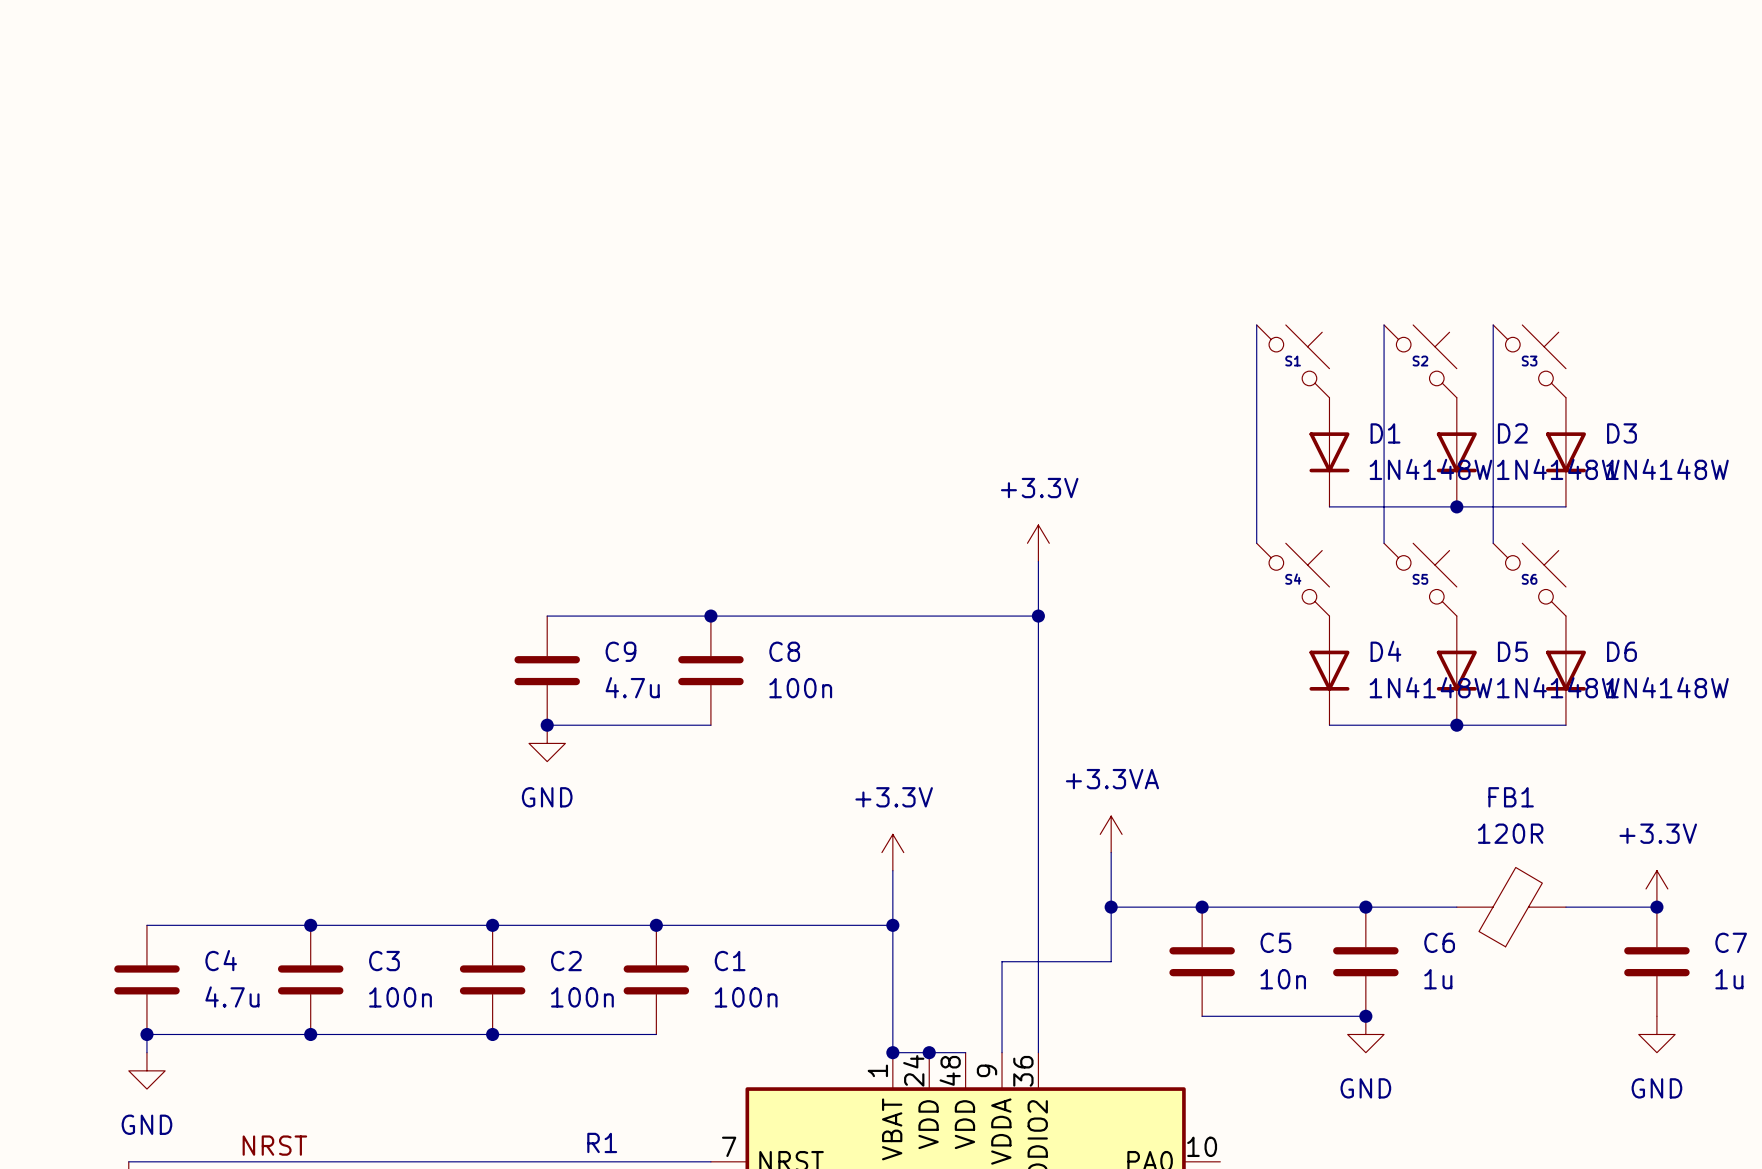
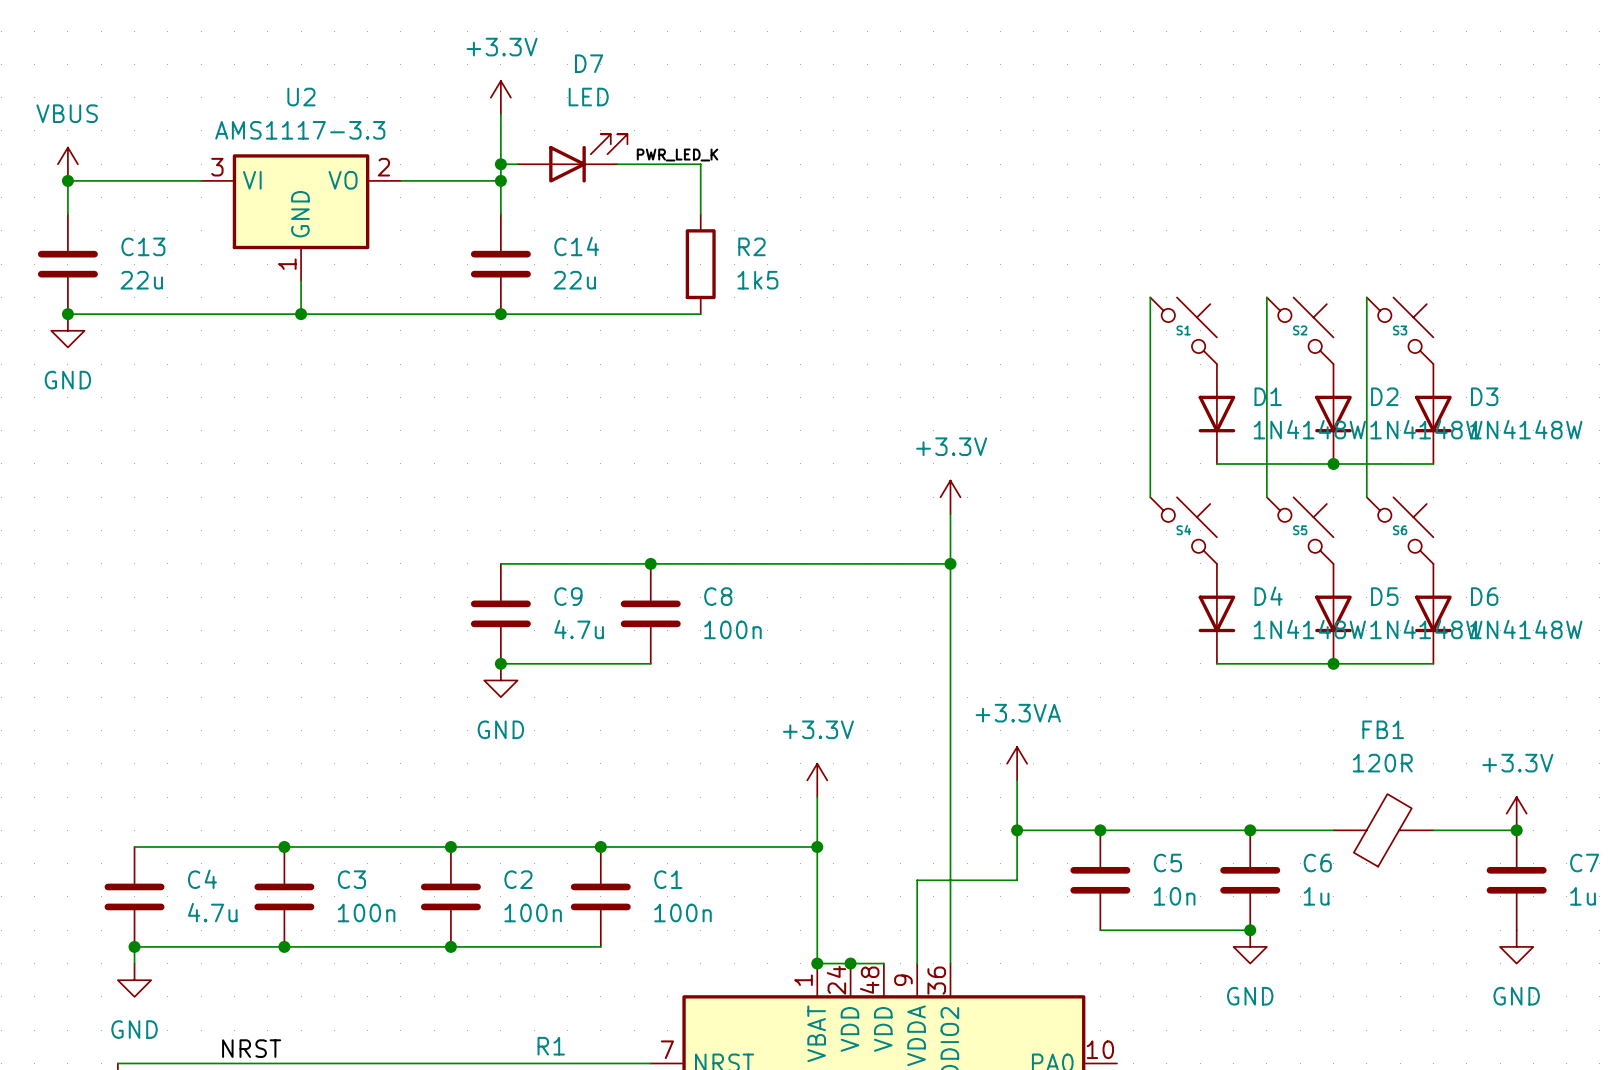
power symbol: none -> +3.3V (500, 97)
wire: none -> (500, 114) (500, 214)
label: none -> PWR_LED_K (677, 155)
D7: none -> LED (572, 158)
power symbol: none -> VBUS (67, 164)
wire: none -> (500, 164) (517, 164)
junction: none -> (500, 164)
wire: none -> (617, 164) (700, 164) (700, 214)
junction: none -> (67, 180)
wire: none -> (201, 180) (67, 180) (67, 214)
wire: none -> (400, 180) (500, 180)
junction: none -> (500, 180)
U2: none -> AMS1117-3.3 (301, 217)
C13: none -> 22u (67, 264)
C14: none -> 22u (500, 264)
R2: none -> 1k5 (700, 264)
wire: none -> (301, 280) (301, 314)
wire: none -> (67, 314) (700, 314)
junction: none -> (67, 314)
junction: none -> (301, 314)
junction: none -> (500, 314)
power symbol: none -> GND (67, 330)

